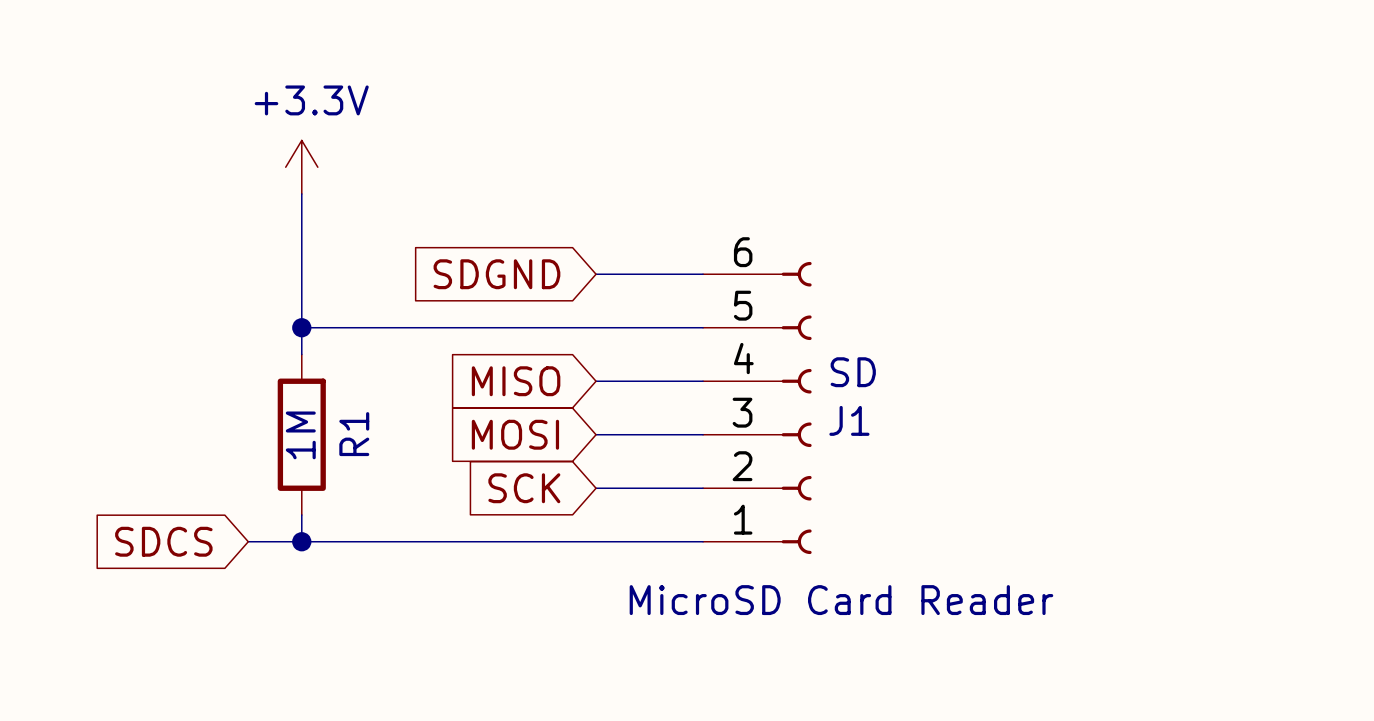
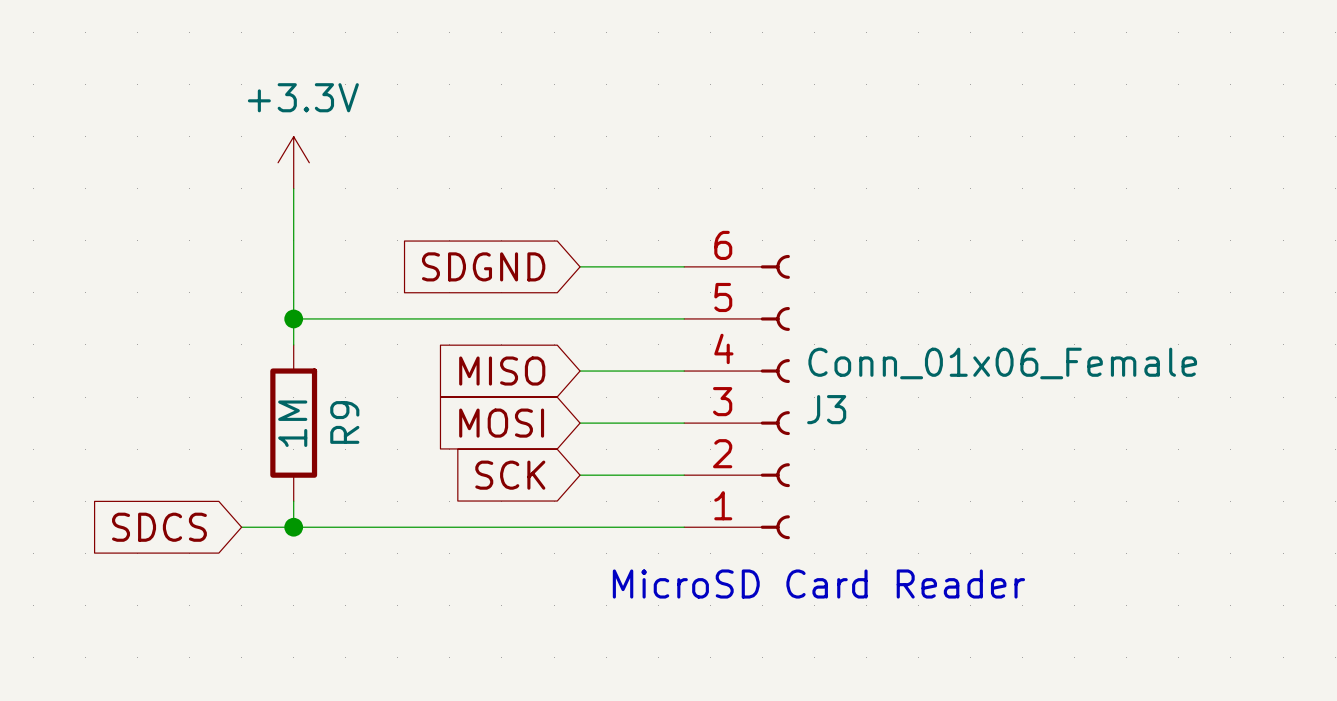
J1 value: SD (853, 372) -> Conn_01x06_Female (1002, 363)
J1 name: J1 (849, 420) -> J3 (826, 409)
R1 name: R1 (354, 434) -> R9 (344, 422)

